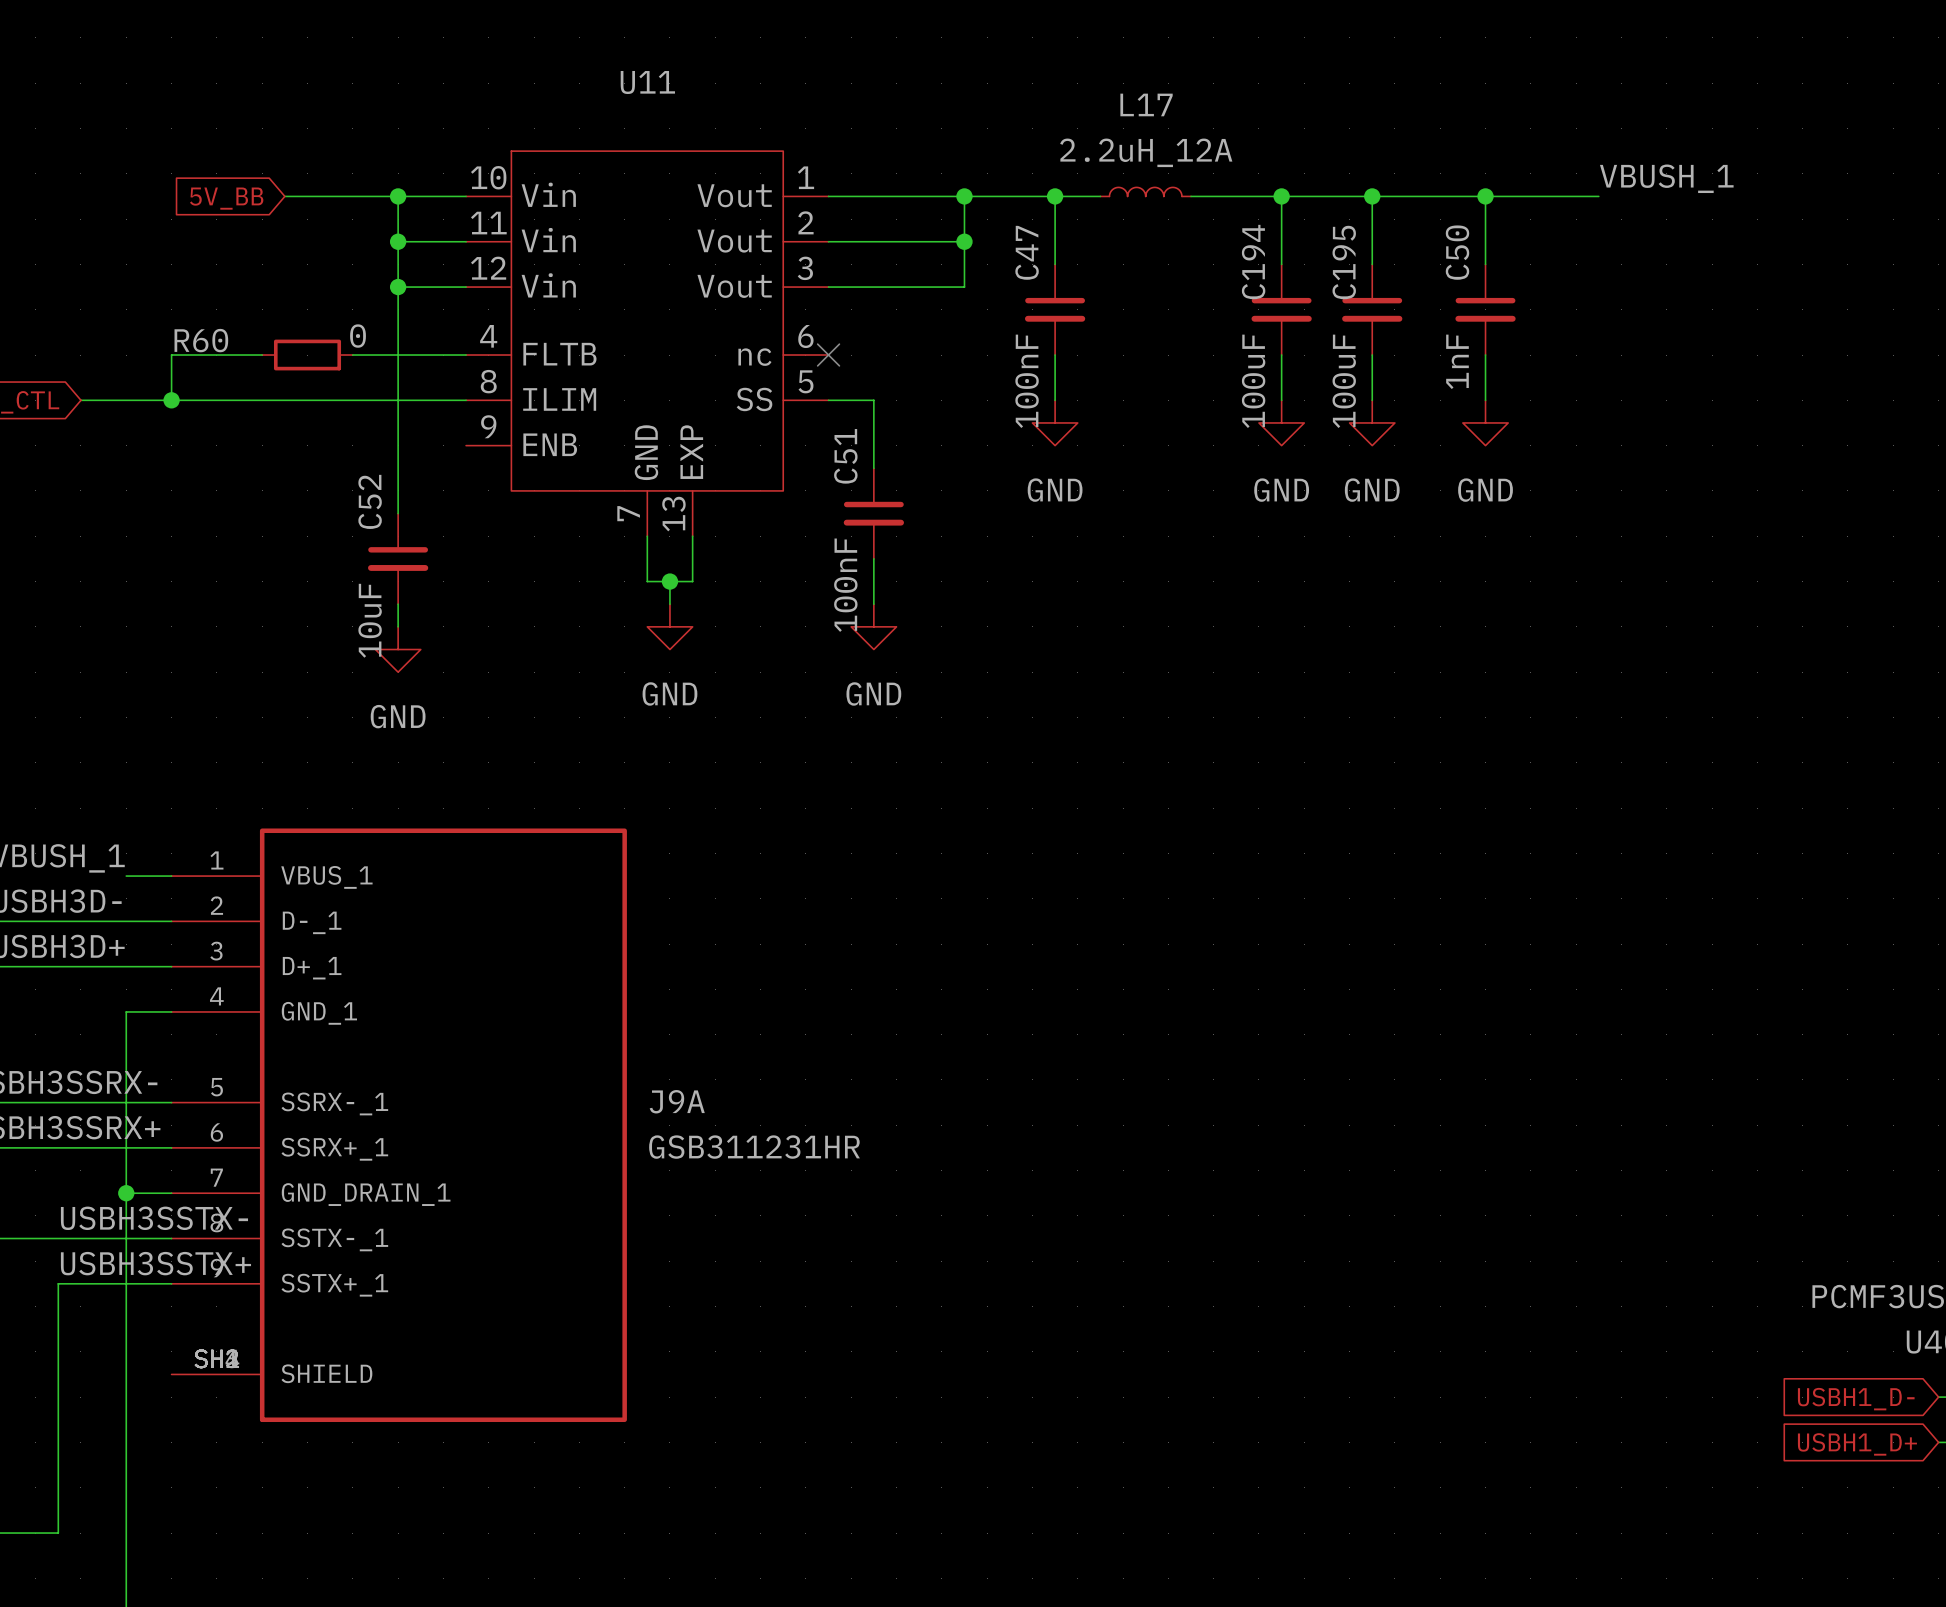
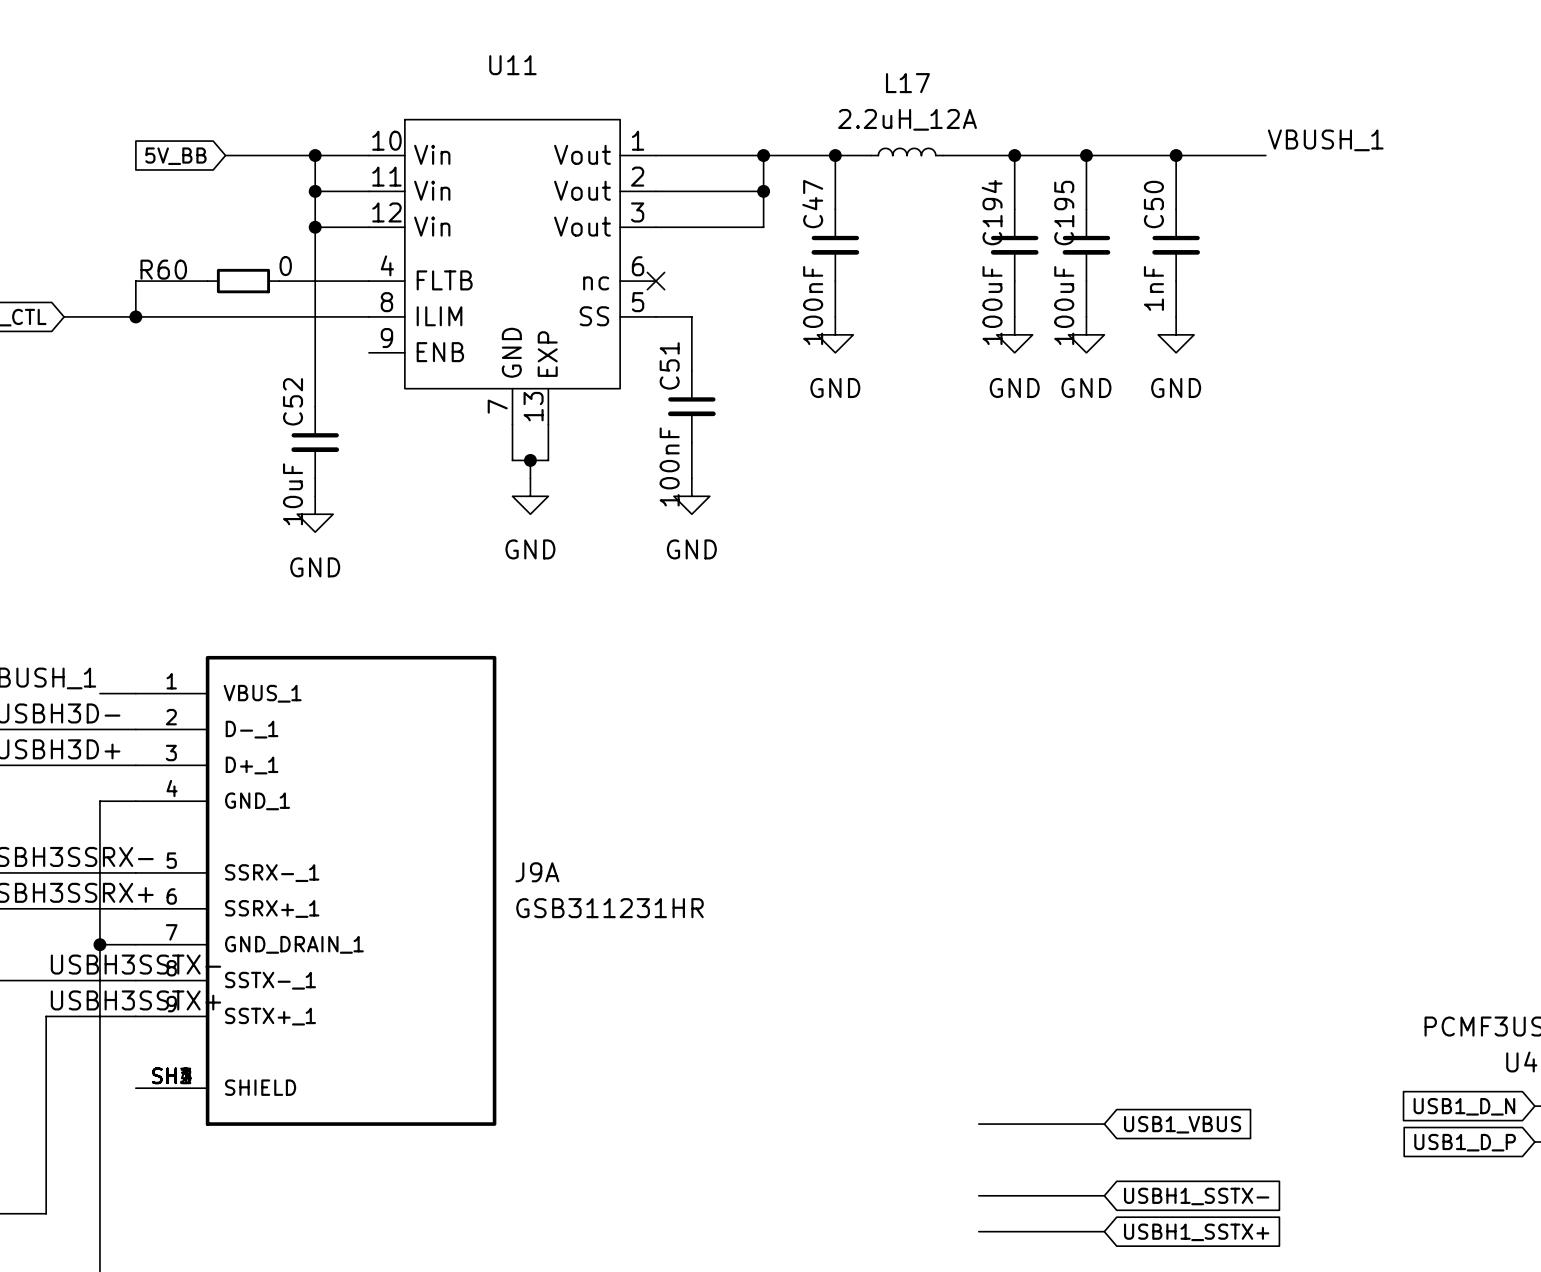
global label: USBH1_D- (1856, 1399) -> USB1_D_N (1464, 1106)
wire: none -> (978, 1124) (1104, 1124)
global label: none -> USB1_VBUS (1182, 1124)
global label: USBH1_D+ (1857, 1444) -> USB1_D_P (1465, 1142)
wire: none -> (978, 1195) (1104, 1195)
global label: none -> USBH1_SSTX- (1196, 1196)
wire: none -> (978, 1231) (1104, 1231)
global label: none -> USBH1_SSTX+ (1196, 1232)

